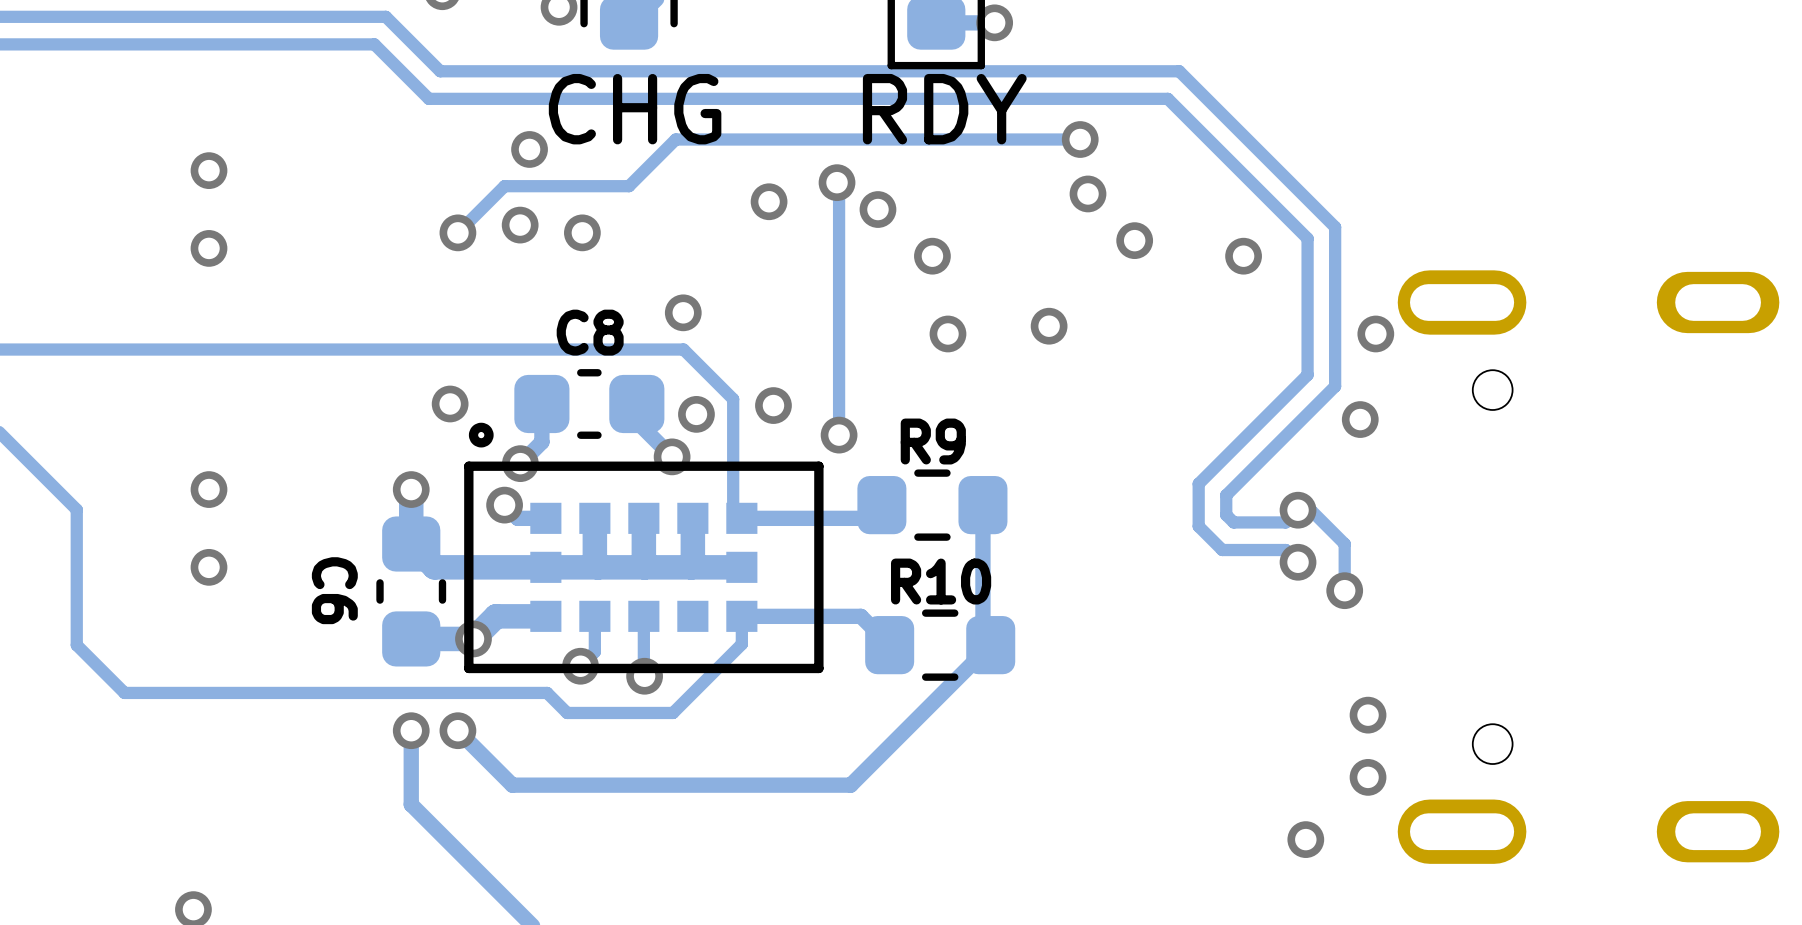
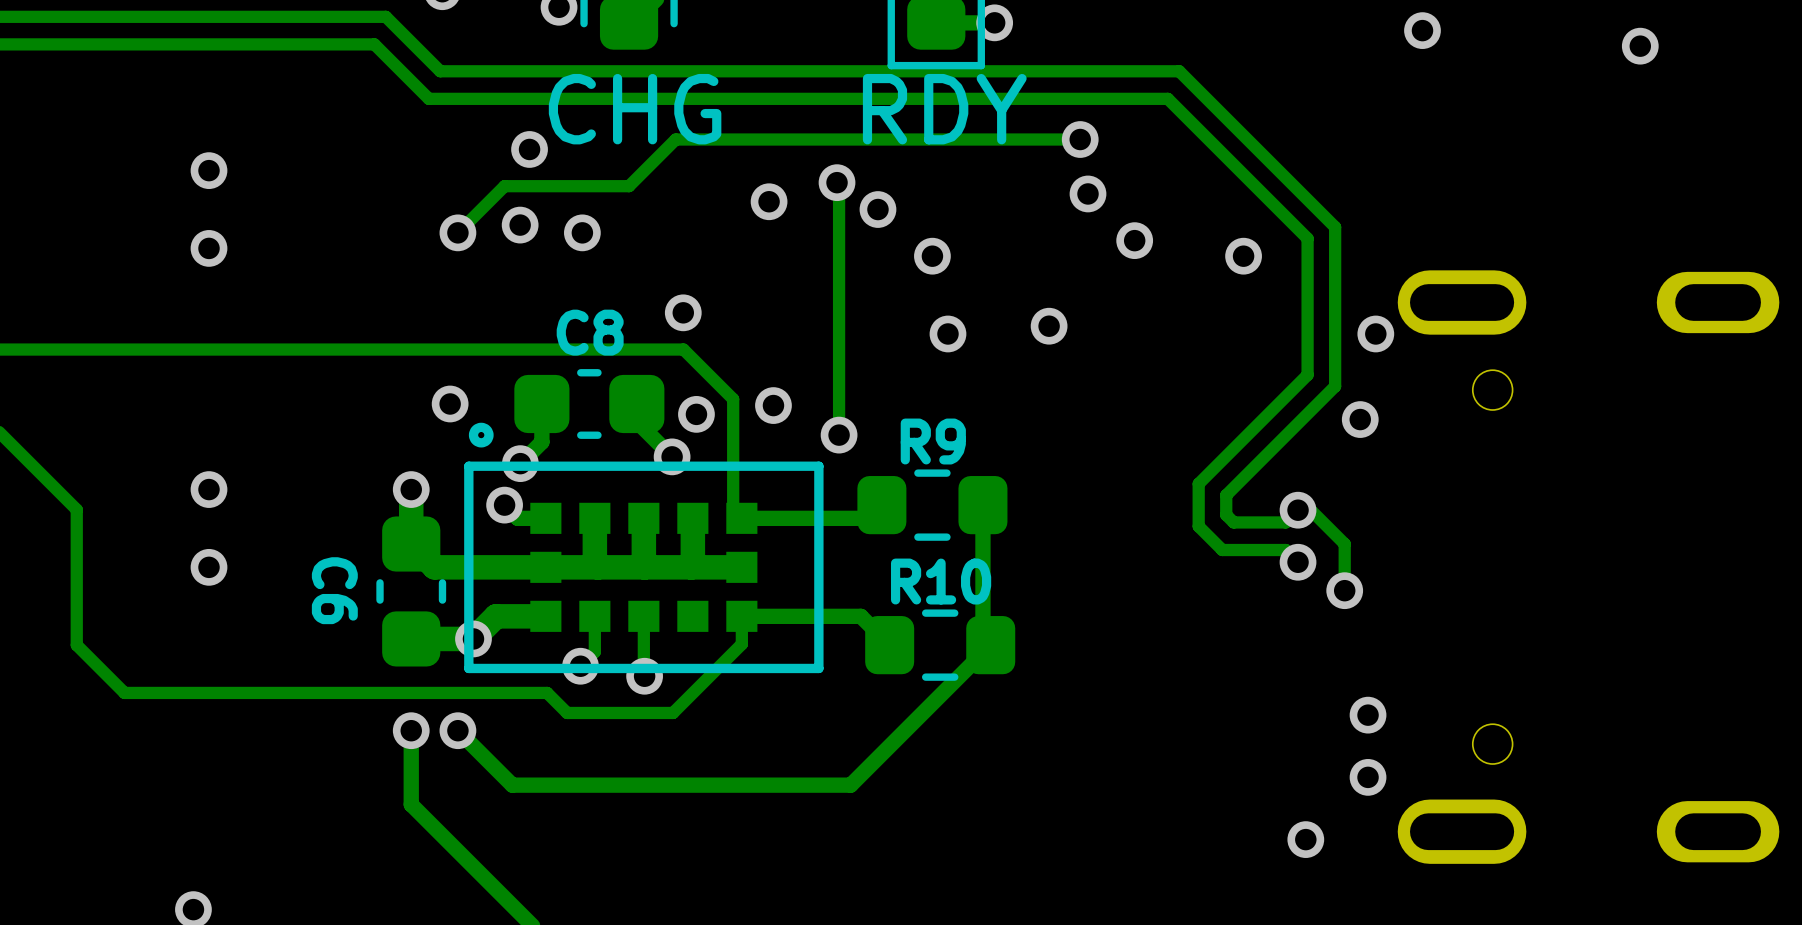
via: none -> (1422, 30)
via: none -> (1640, 46)

